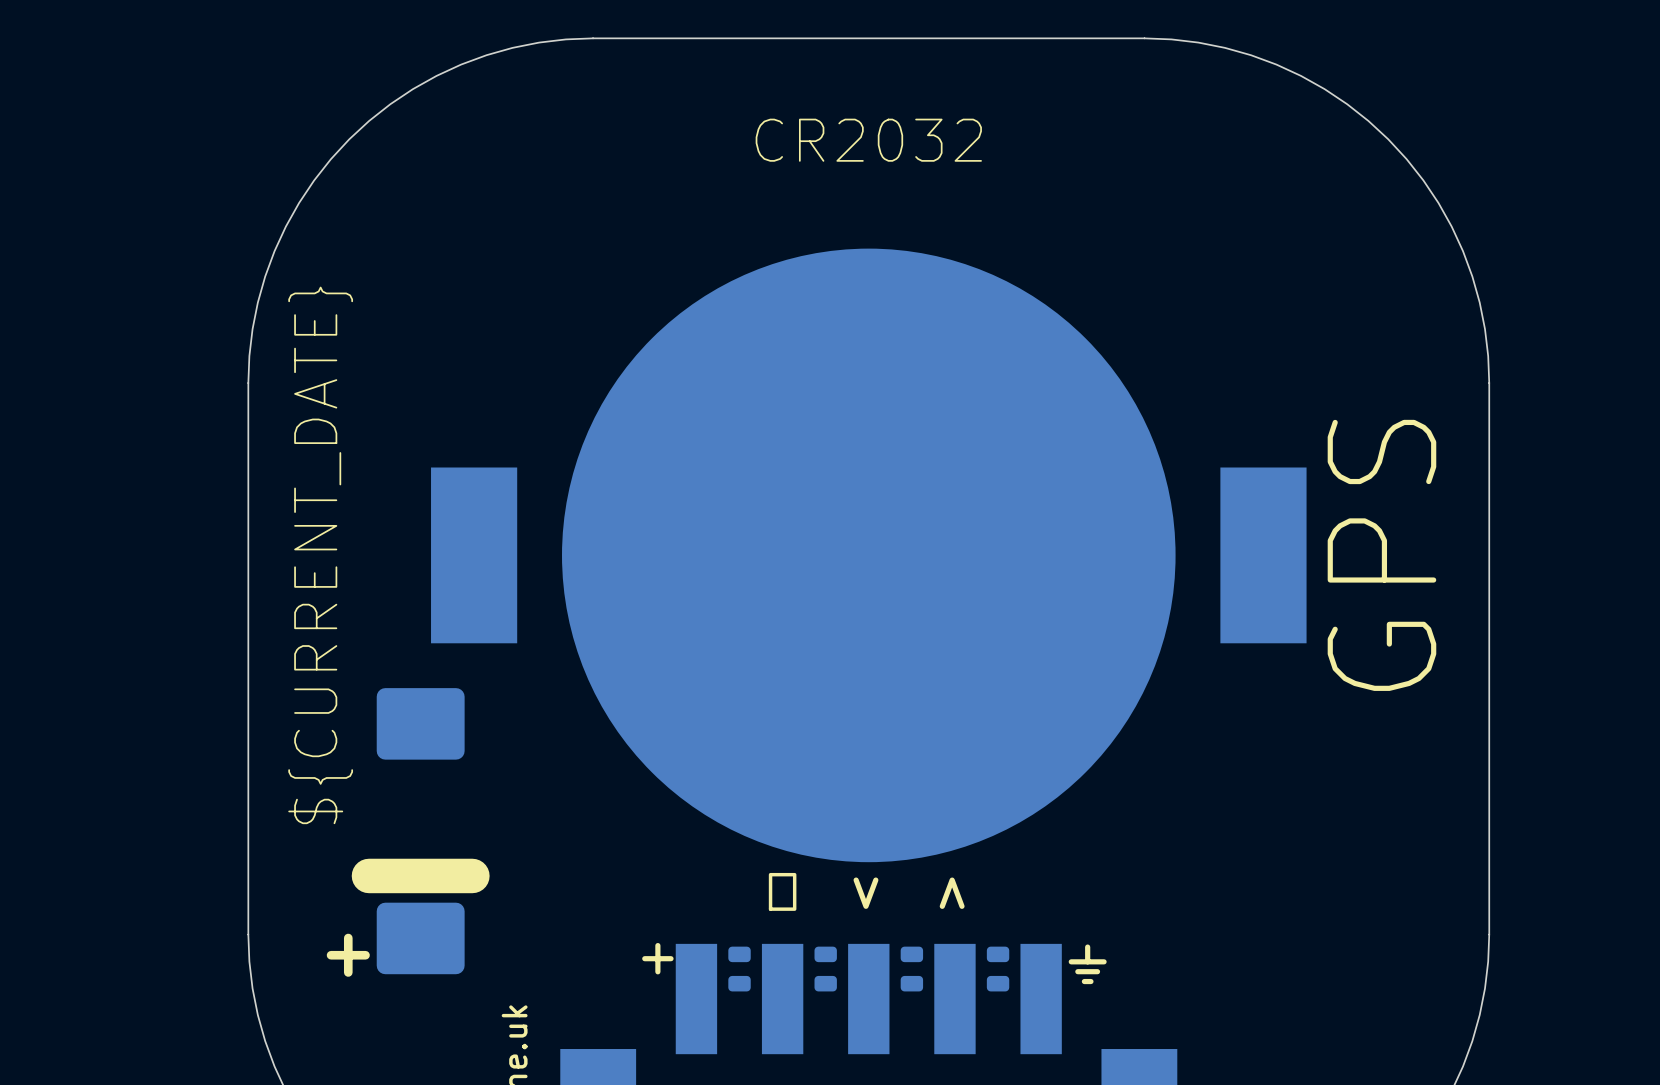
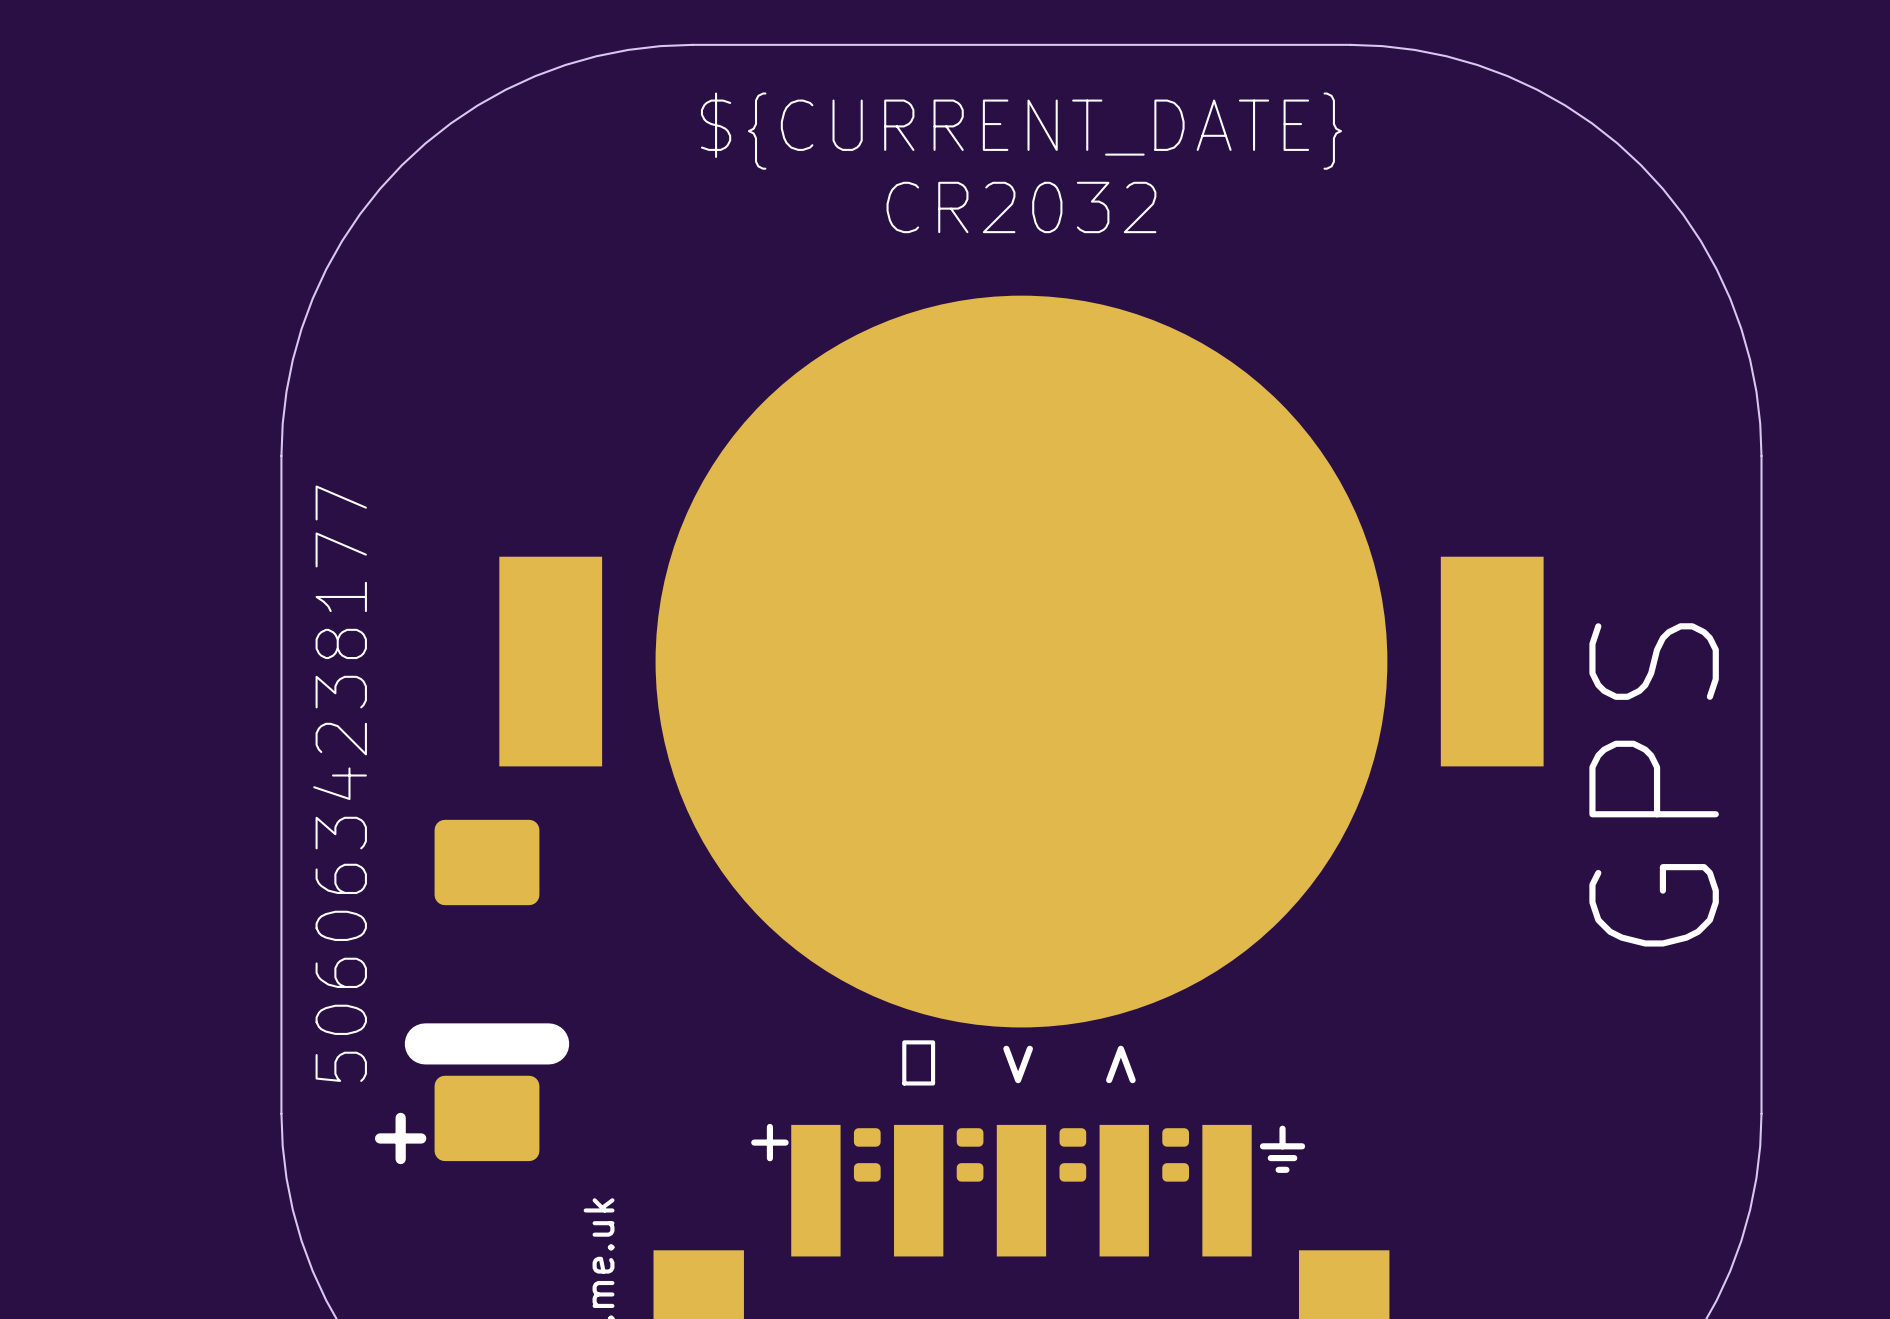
text position: CR2032 (868, 140) -> CR2032 (1021, 207)
text rotation: 0° (320, 555) -> 90° clockwise (1021, 131)
text position: ${CURRENT_DATE} (320, 555) -> ${CURRENT_DATE} (1021, 131)
text position: GPS (1381, 555) -> GPS (1654, 784)
text: none -> 5060634238177 (340, 783)

